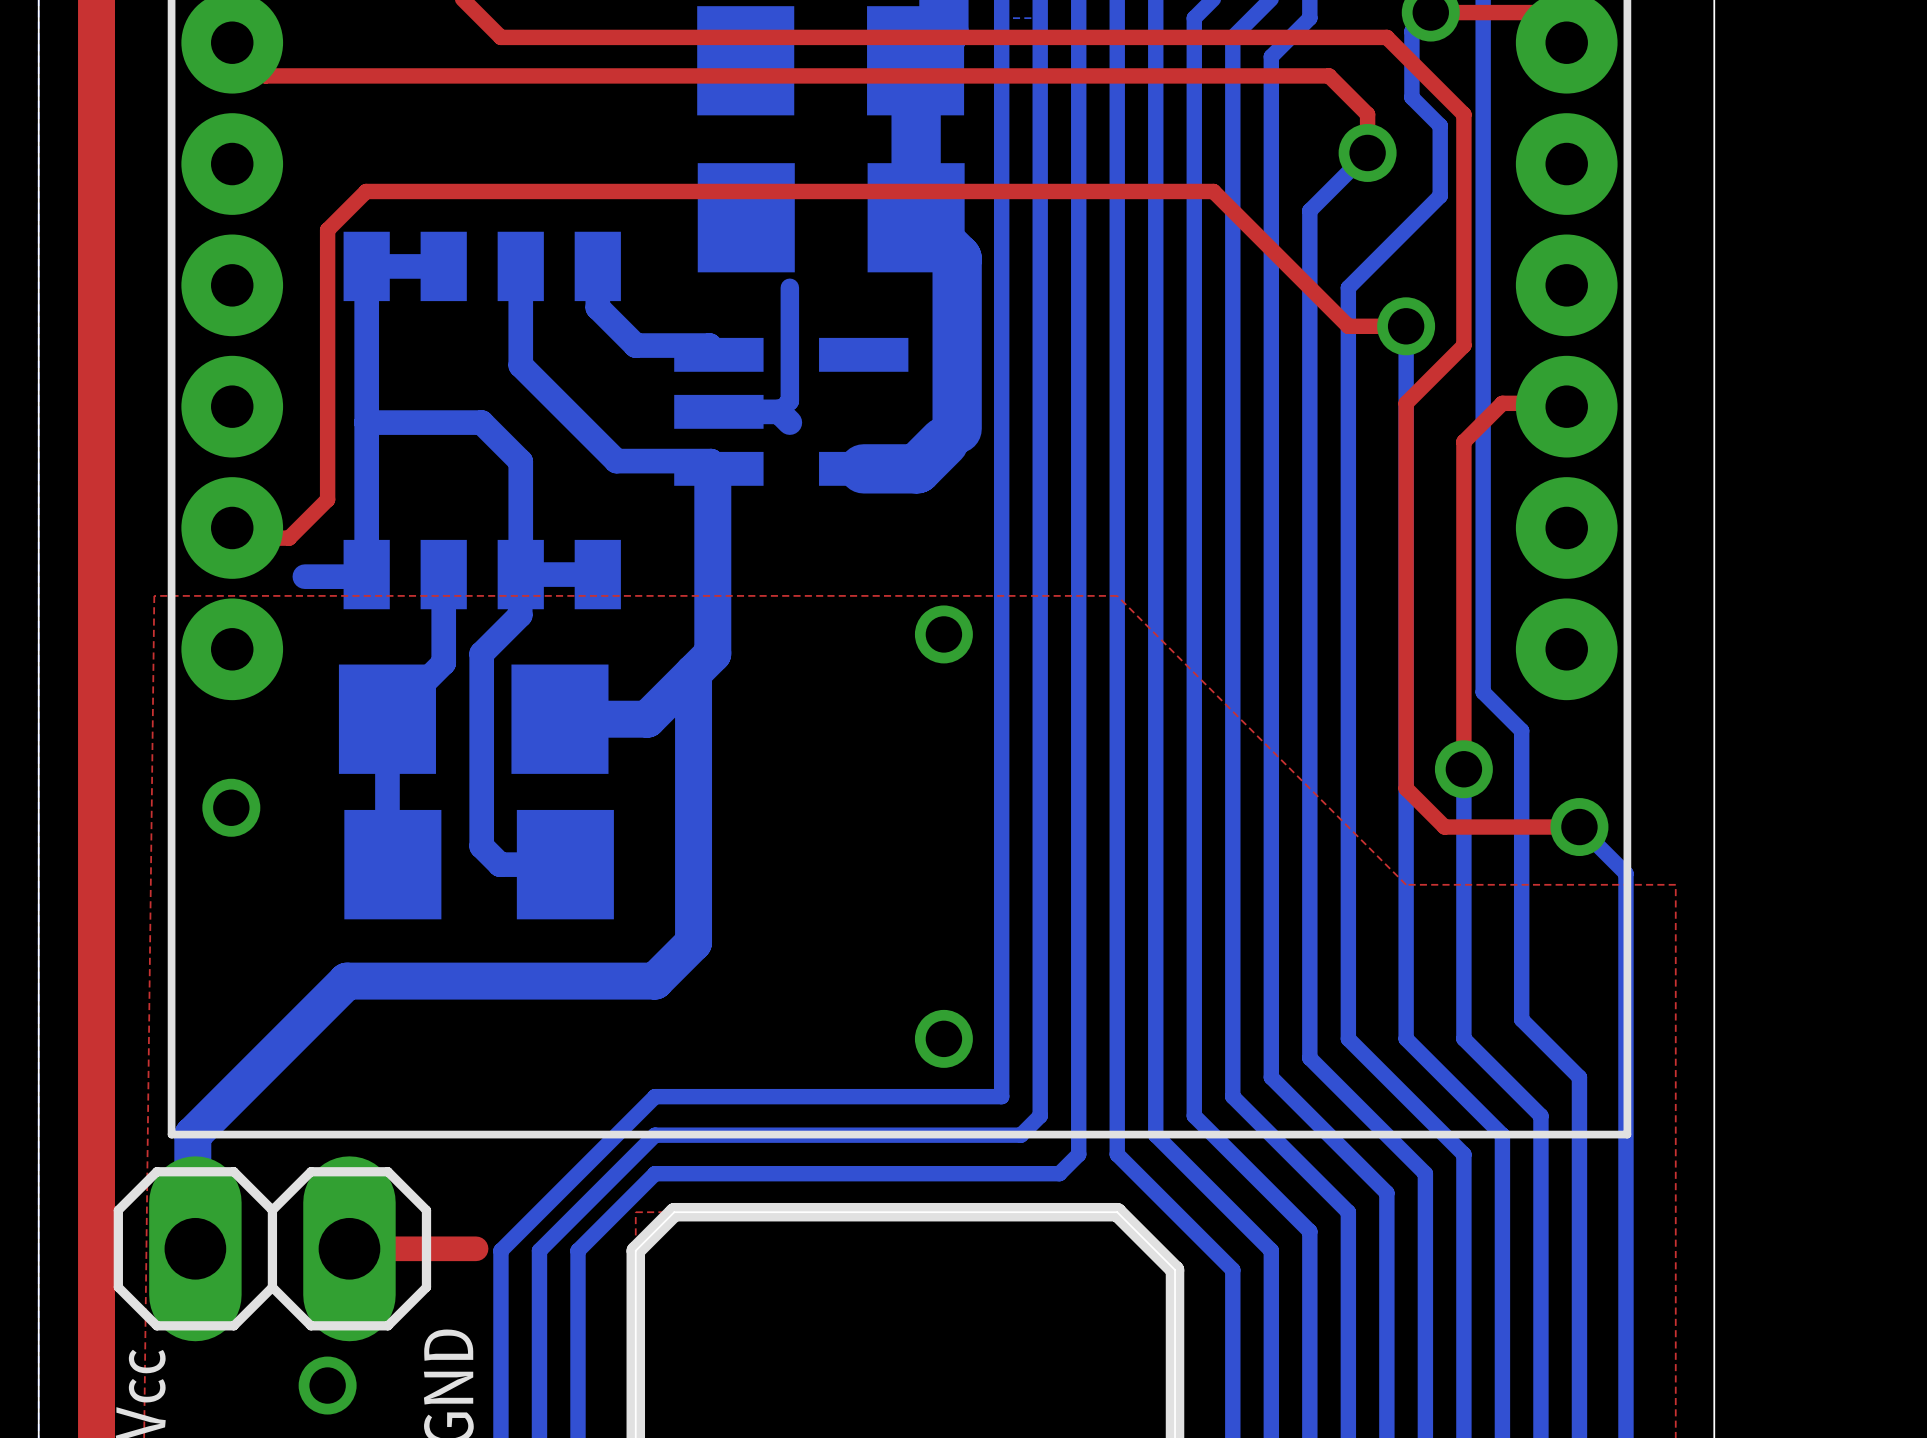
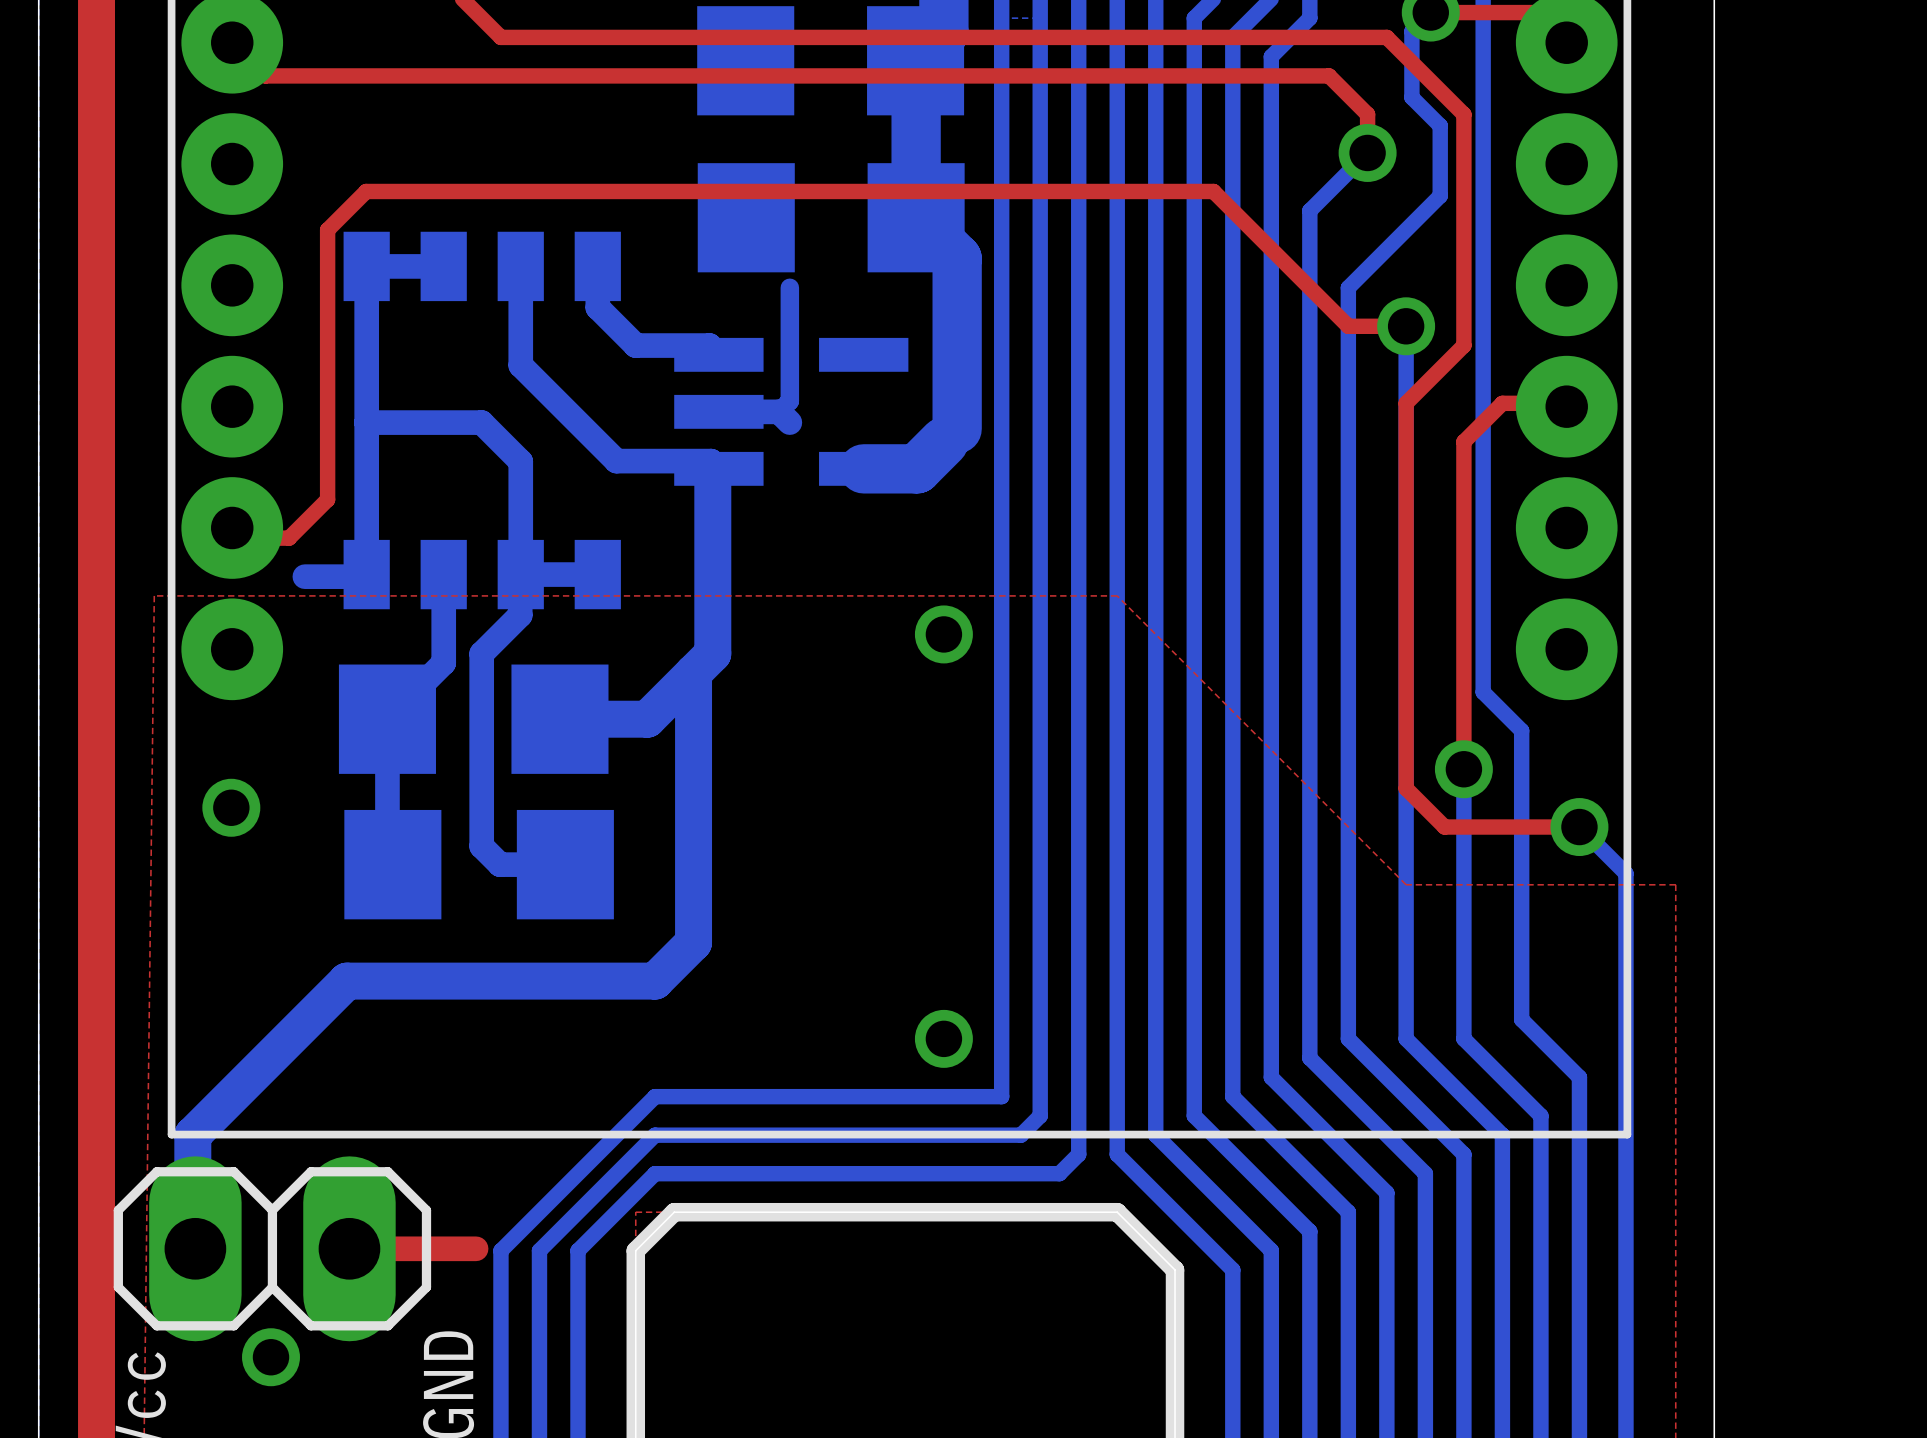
via position: (327, 1385) -> (271, 1357)

